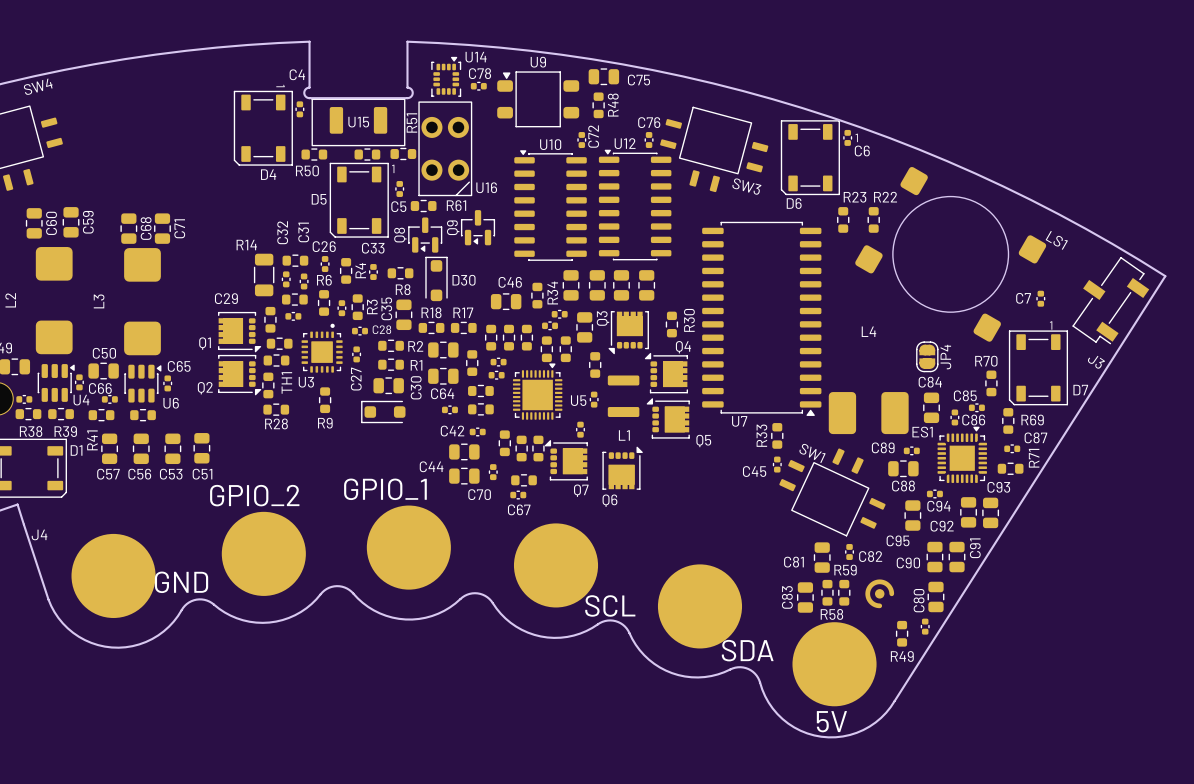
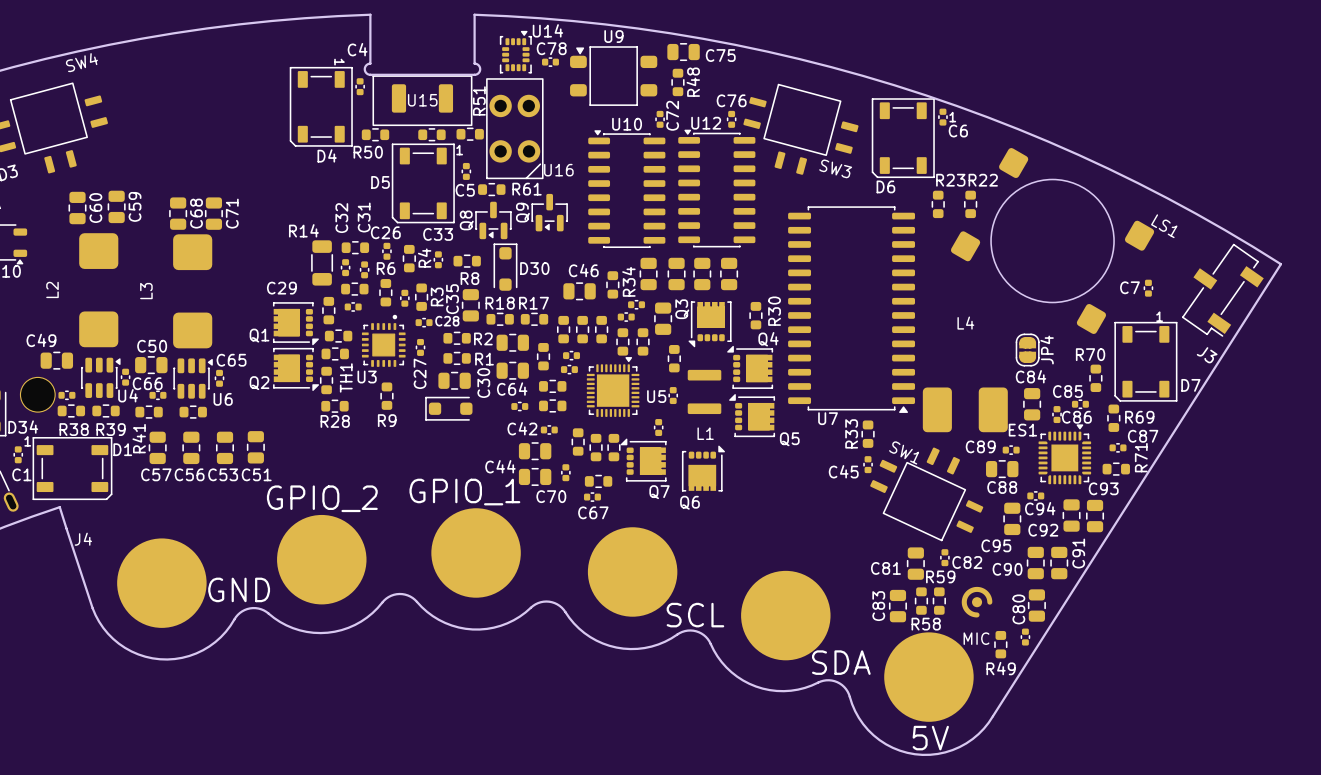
MIC name: none -> MIC (976, 638)

